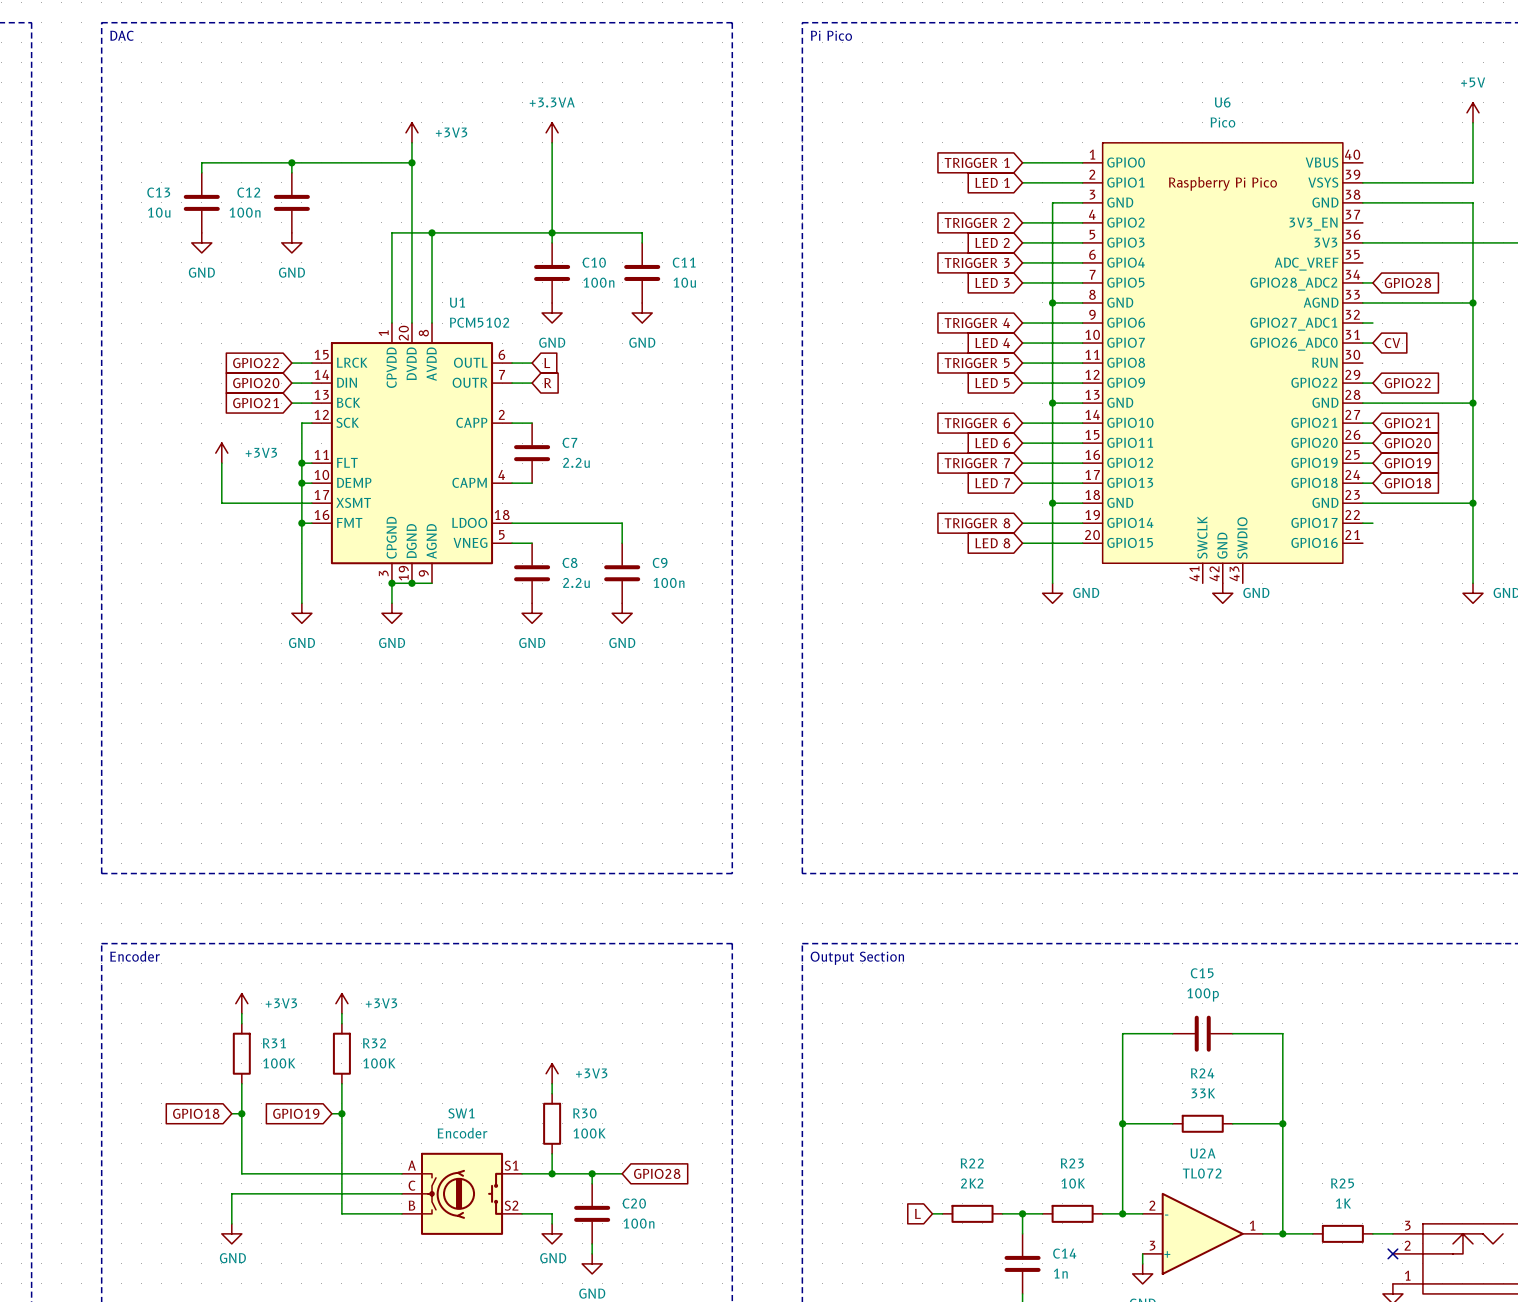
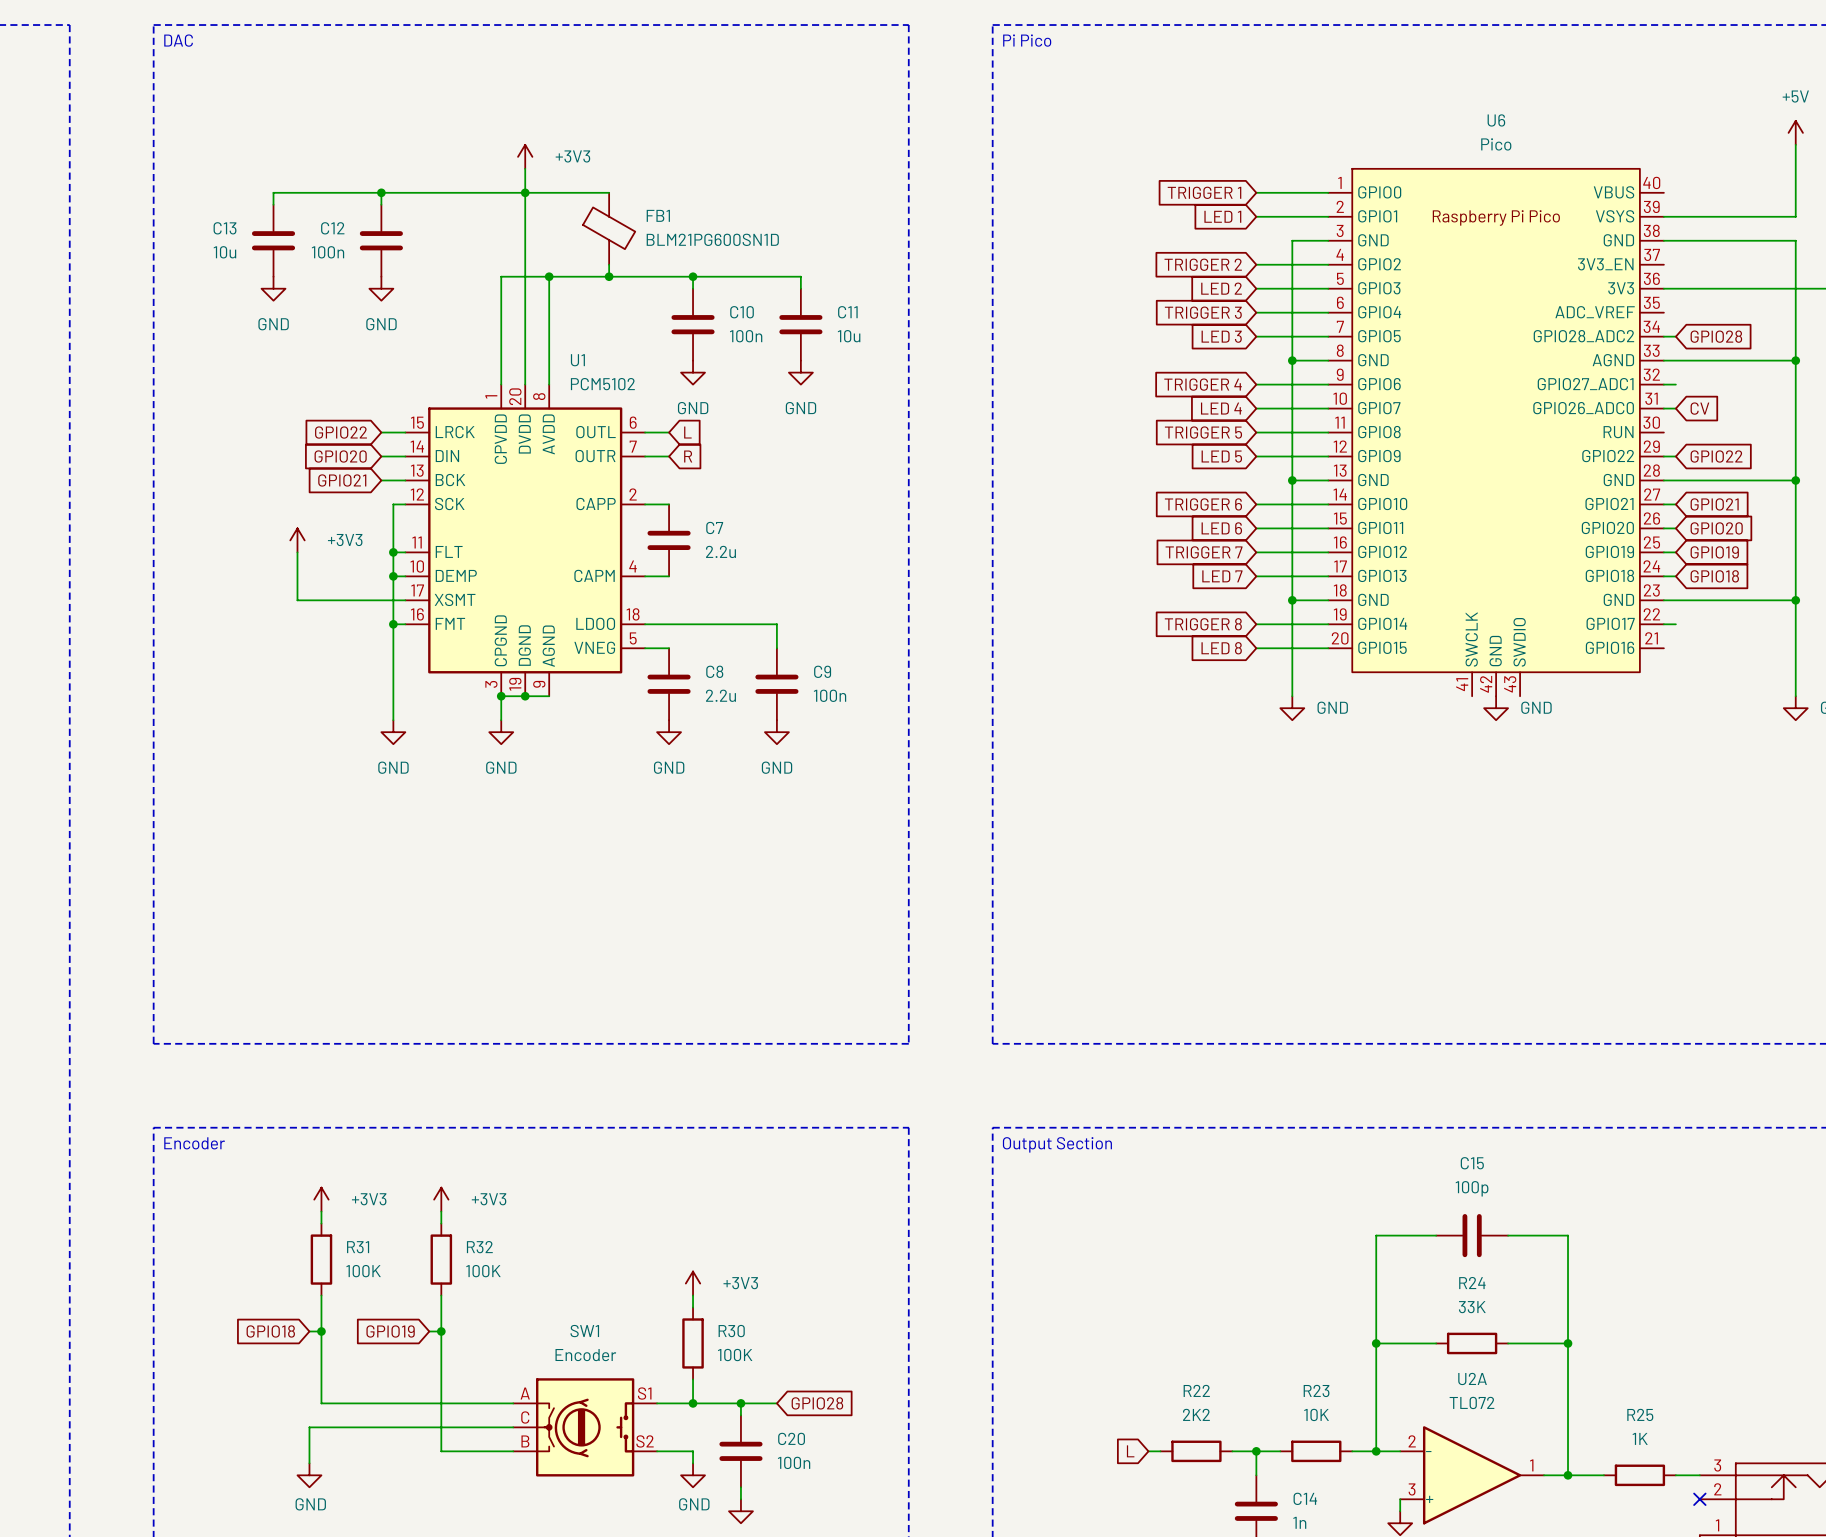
power symbol: +3.3VA (552, 132) -> none
wire: (552, 142) (552, 232) -> none
wire: none -> (525, 192) (609, 192)
FB1: none -> BLM21PG600SN1D (609, 228)
wire: none -> (609, 264) (609, 276)
junction: none -> (609, 276)

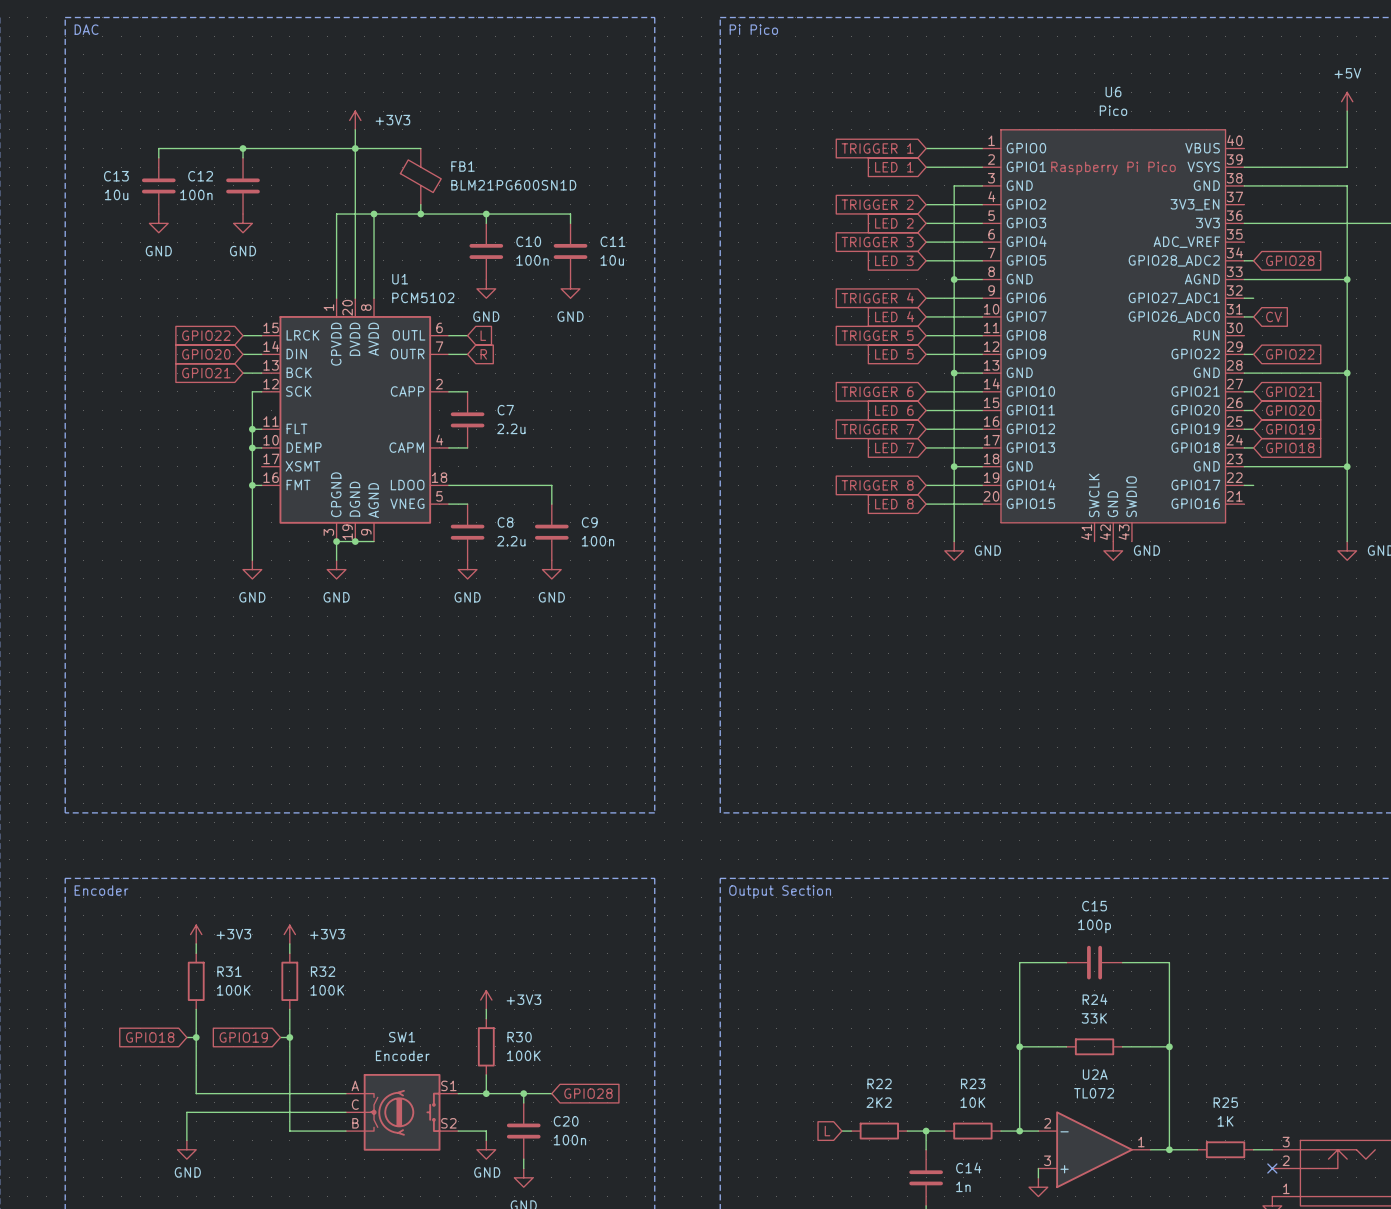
power symbol: +3V3 (297, 540) -> none
wire: (297, 552) (297, 600) (405, 600) -> none

